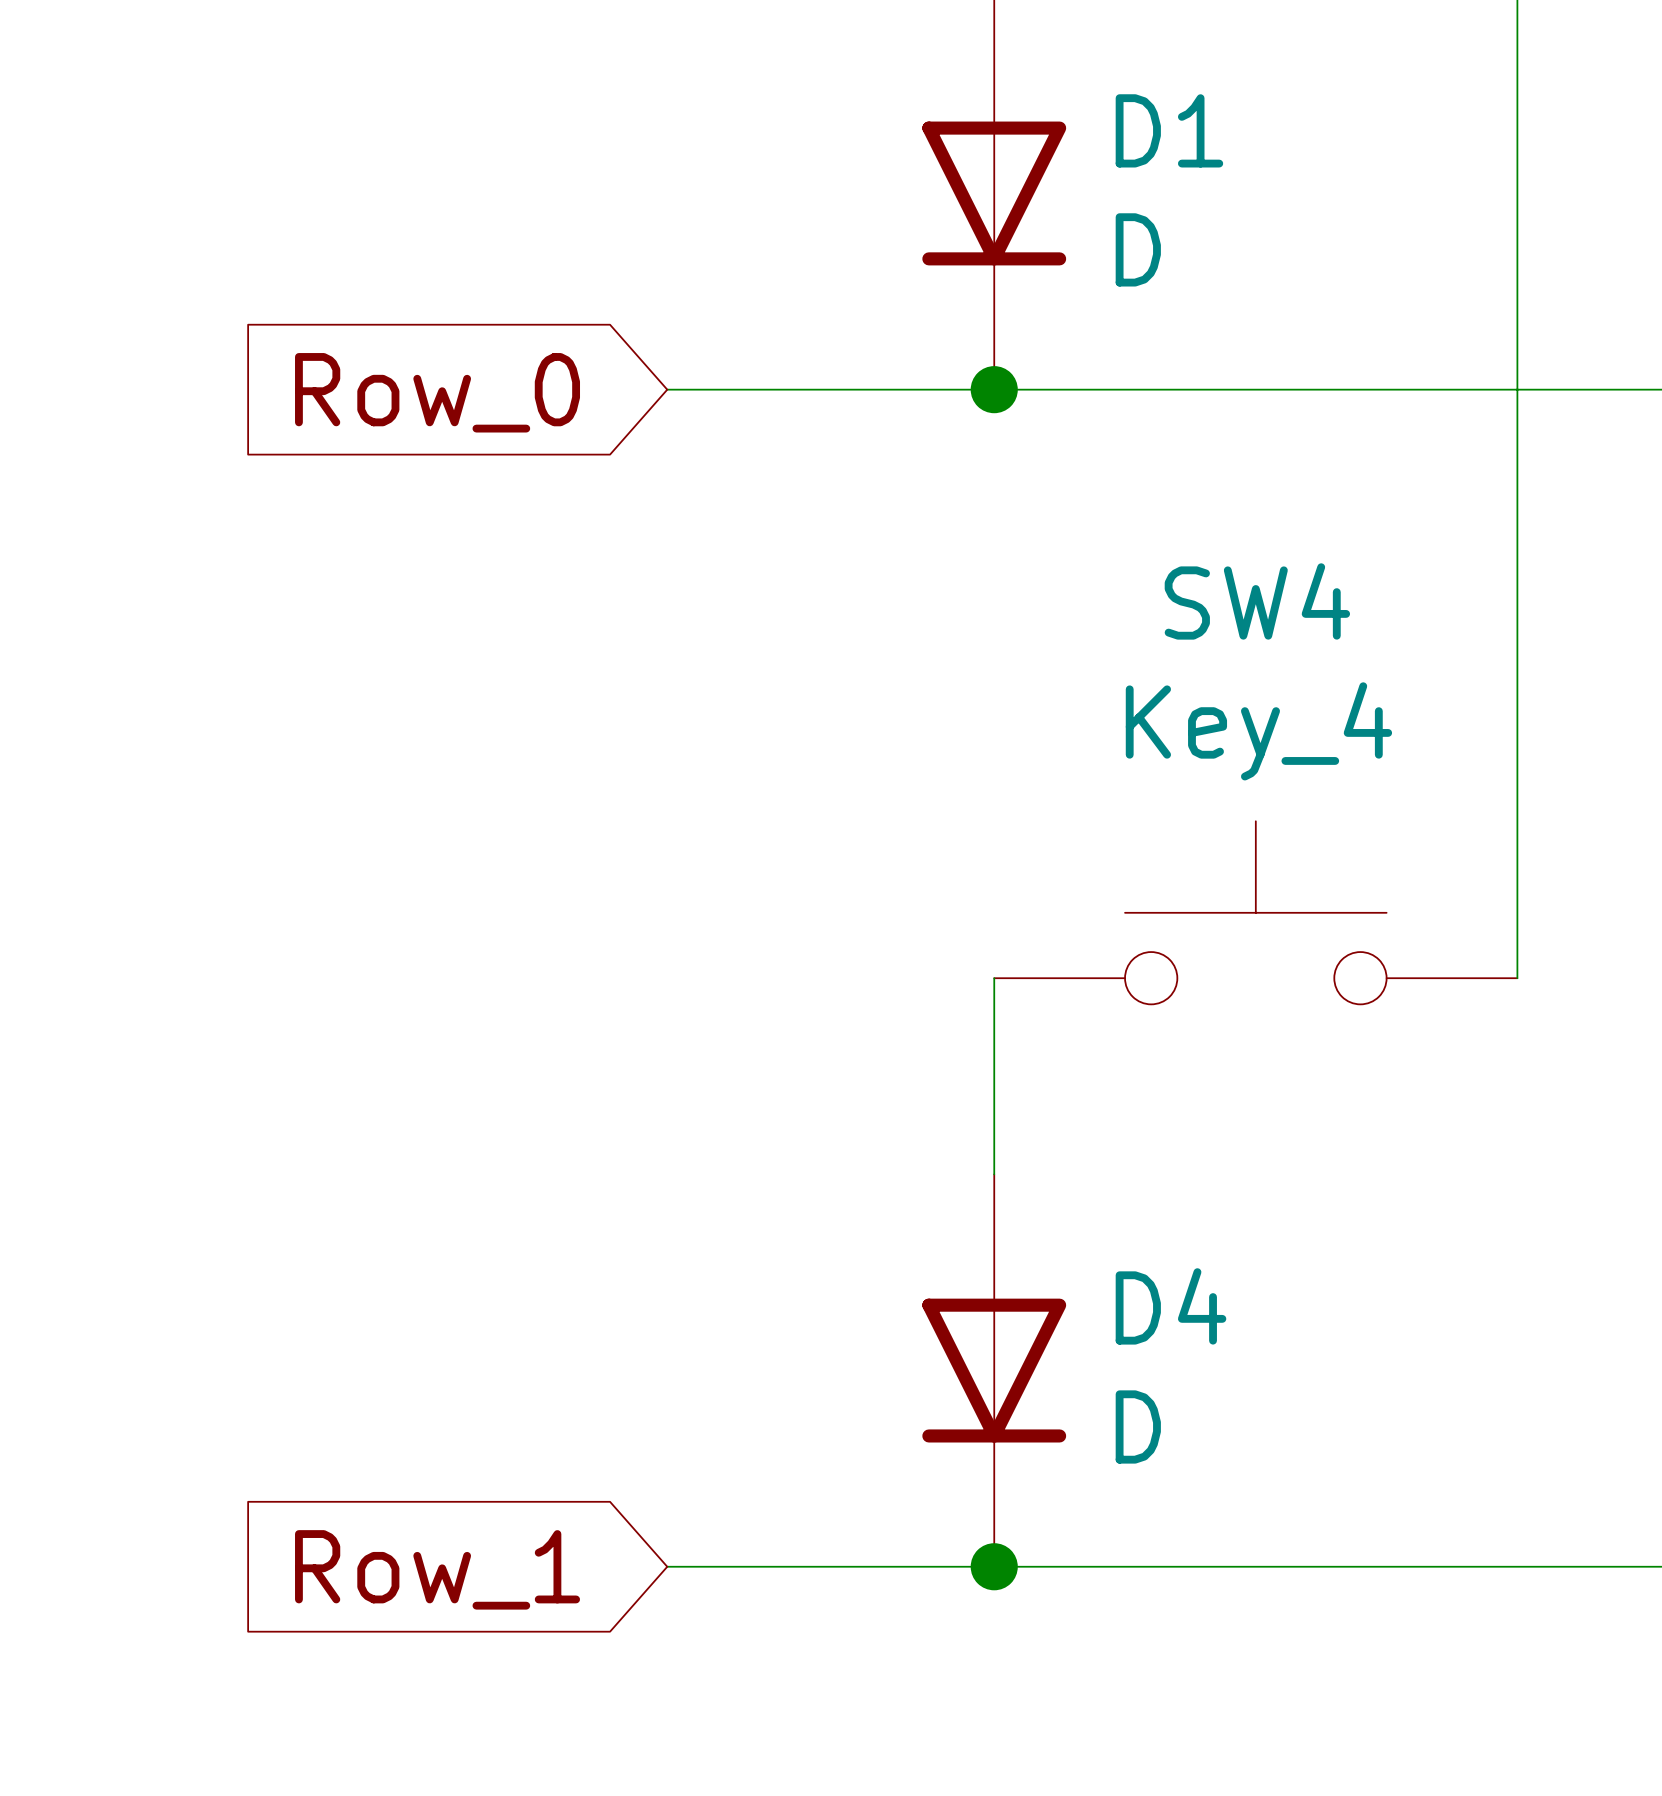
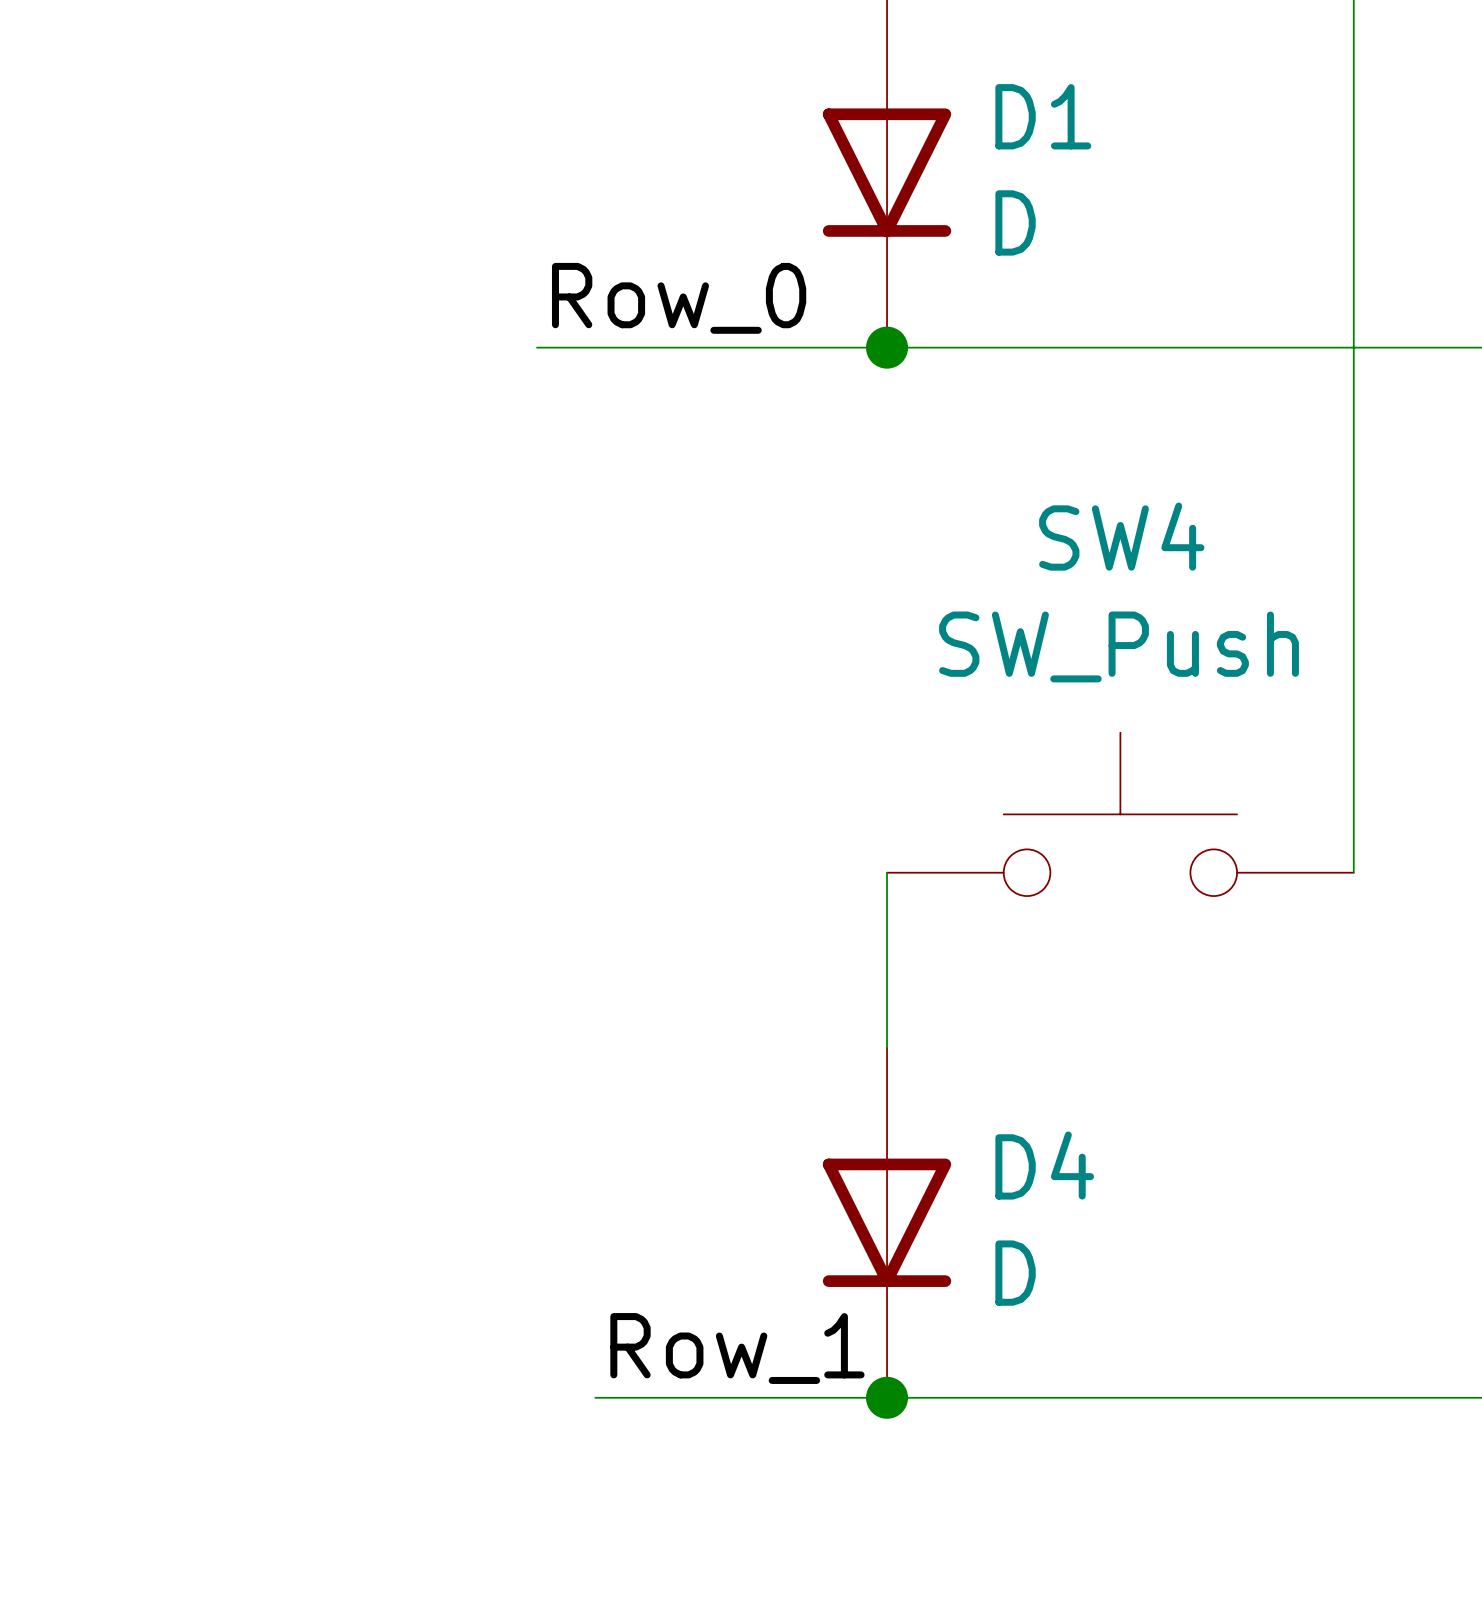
label: none -> Row_0 (679, 298)
wire: none -> (536, 347) (595, 347)
global label: Row_0 (437, 392) -> none
SW4 value: Key_4 (1258, 731) -> SW_Push (1119, 646)
label: none -> Row_1 (737, 1348)
global label: Row_1 (437, 1569) -> none

